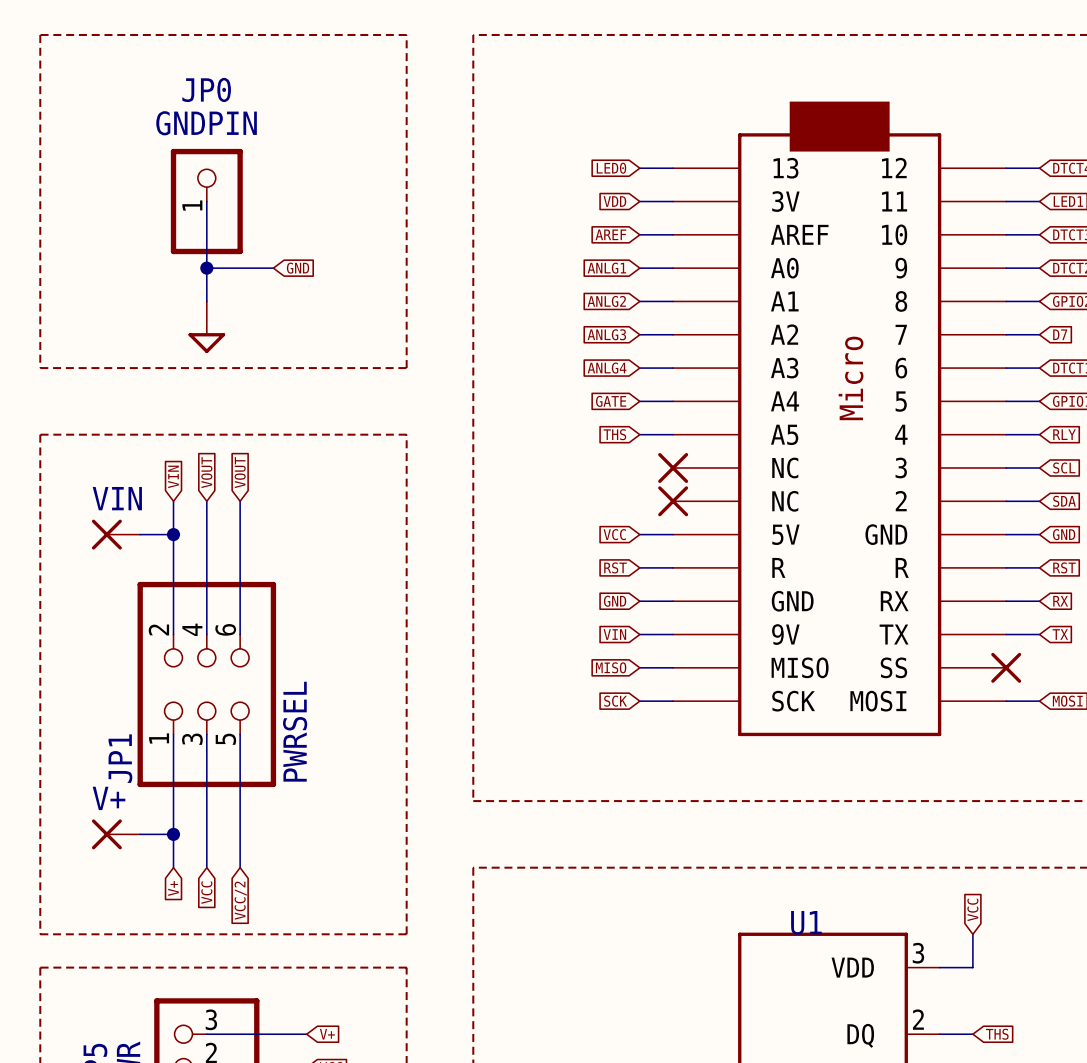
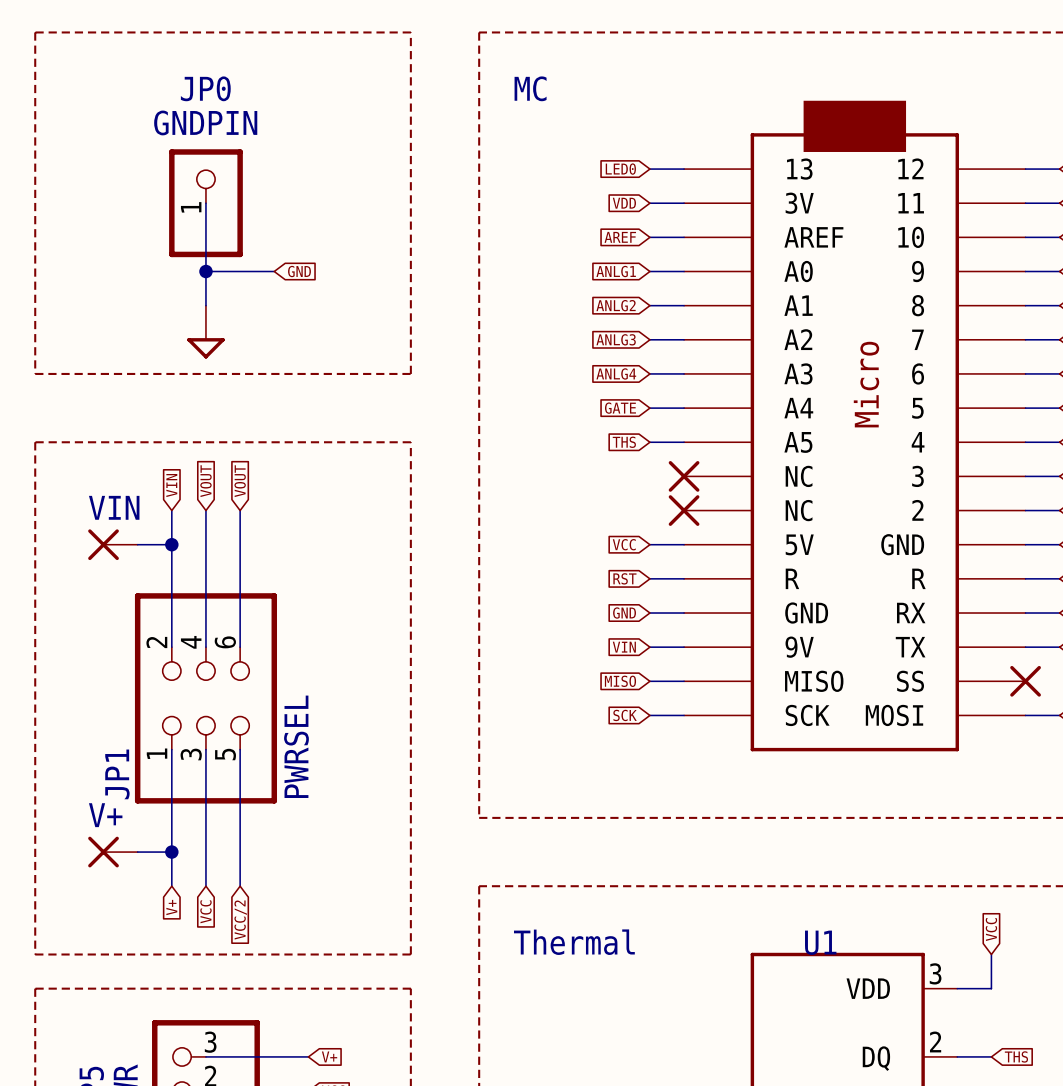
text: none -> MC (530, 88)
text: none -> Thermal (574, 942)

